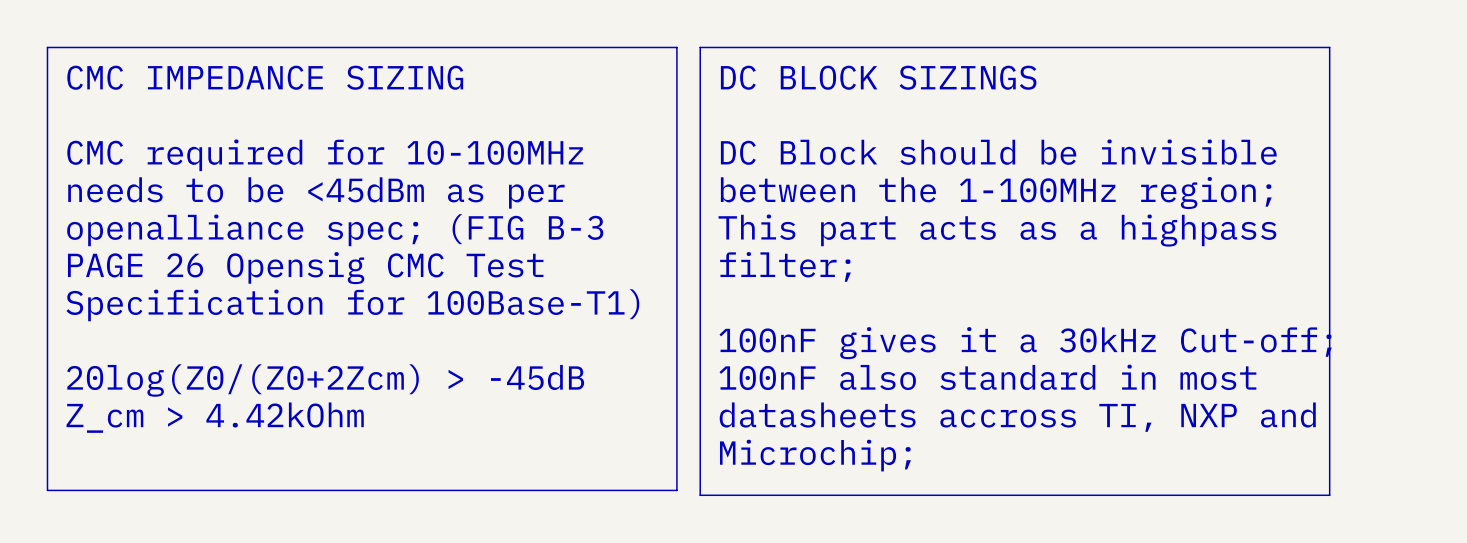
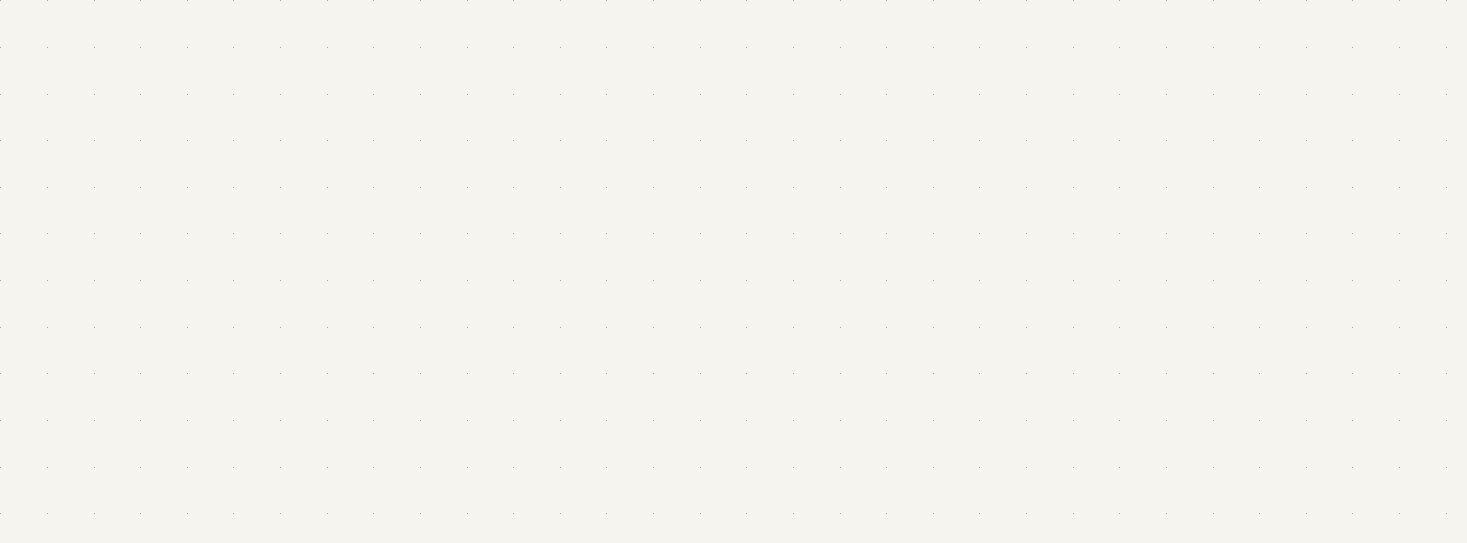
line: (47, 47) (676, 47) (676, 490) (47, 490) (47, 47) -> none
line: (700, 47) (1329, 47) (1329, 495) (700, 495) (700, 47) -> none
text: CMC IMPEDANCE SIZING (265, 77) -> none
text: DC BLOCK SIZINGS (878, 77) -> none
text: DC Block should be invisible (998, 152) -> none
text: CMC required for 10-100MHz (325, 155) -> none
text: needs to be <45dBm as per (316, 192) -> none
text: between the 1-100MHz region; (996, 193) -> none
text: openalliance spec; (FIG B-3 (335, 230) -> none
text: This part acts as a highpass (997, 230) -> none
text: filter; (785, 266) -> none
text: PAGE 26 Opensig CMC Test (305, 268) -> none
text: Specification for 100Base-T1) (352, 305) -> none
text: 100nF gives it a 30kHz Cut-off; (1025, 343) -> none
text: 100nF also standard in most (987, 377) -> none
text: 20log(Z0/(Z0+2Zcm) > -45dB (325, 380) -> none
text: Z_cm > 4.42kOhm (215, 417) -> none
text: datasheets accross TI, NXP and (1017, 417) -> none
text: Microchip; (815, 455) -> none

